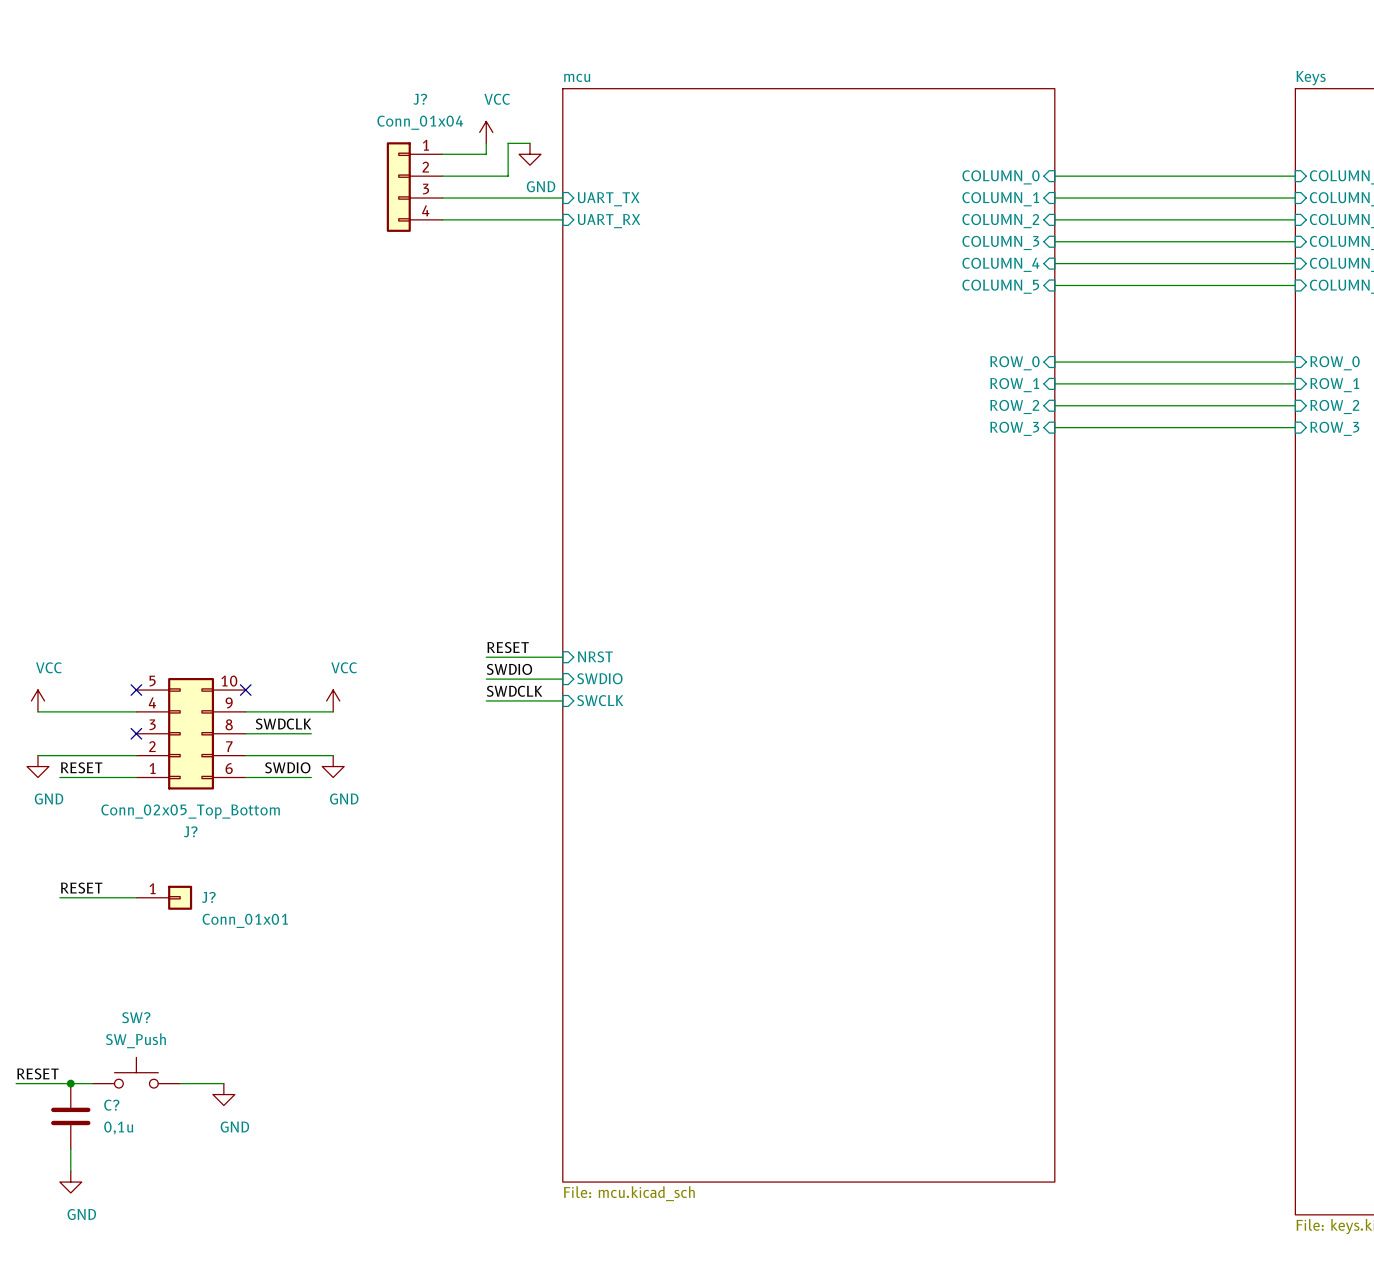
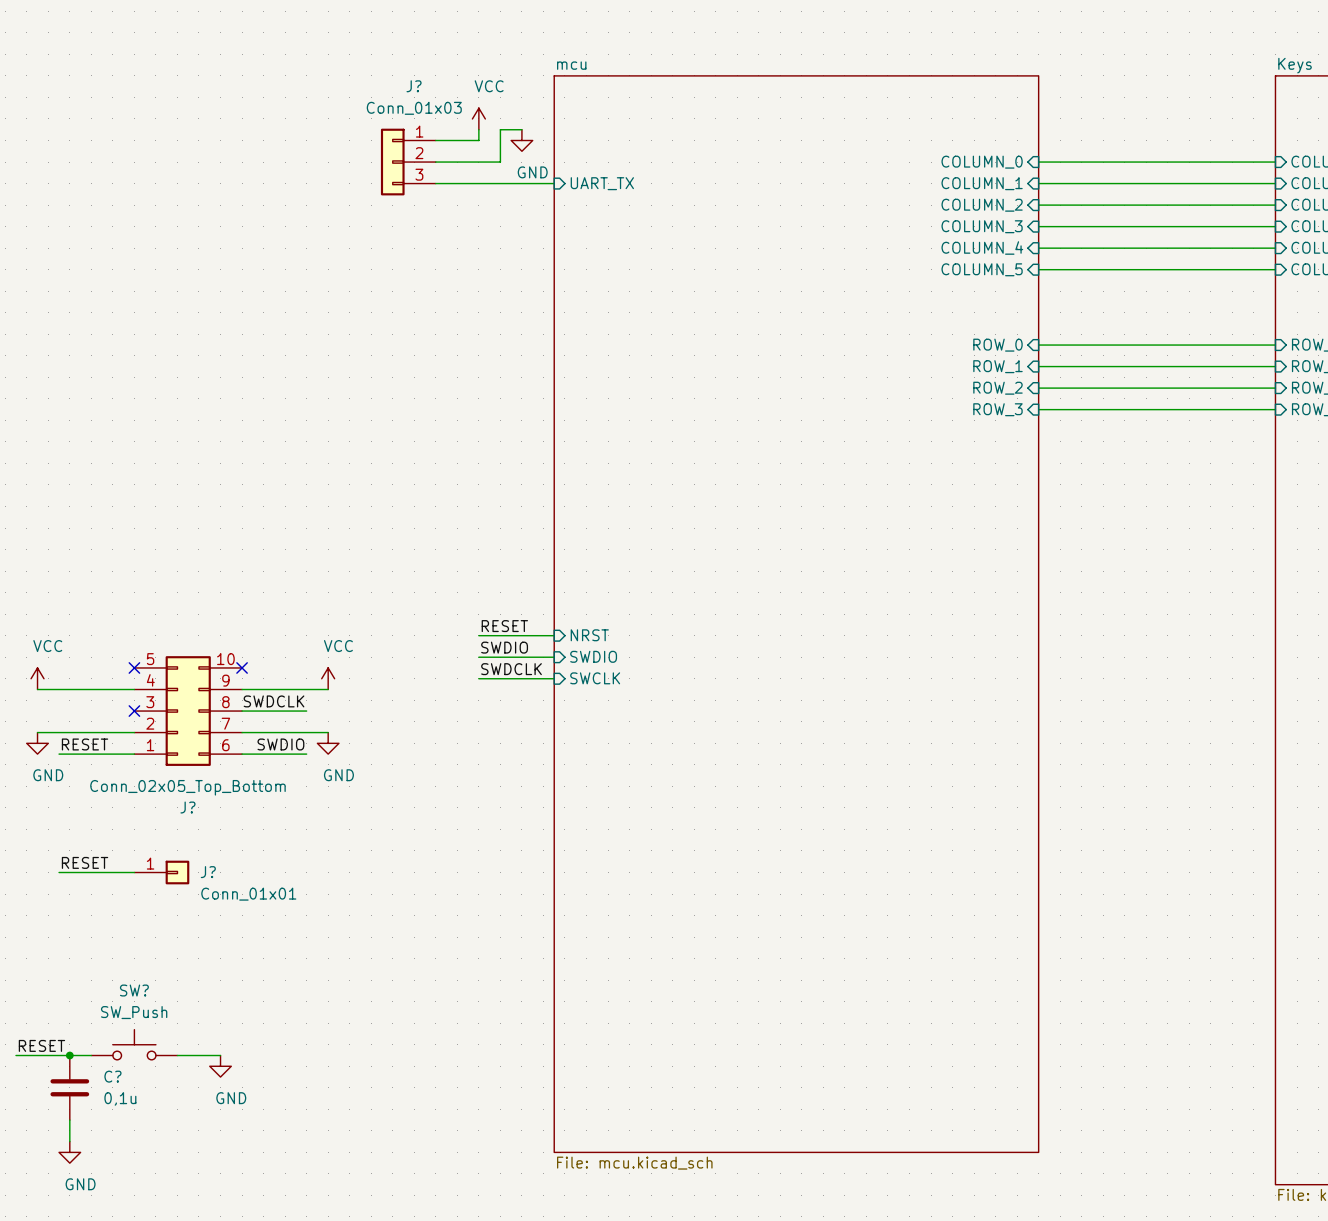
J?: none -> Conn_01x03 (408, 162)
J?: Conn_01x04 (414, 187) -> none
wire: (442, 219) (562, 219) -> none
sheet pin: UART_RX (609, 221) -> none

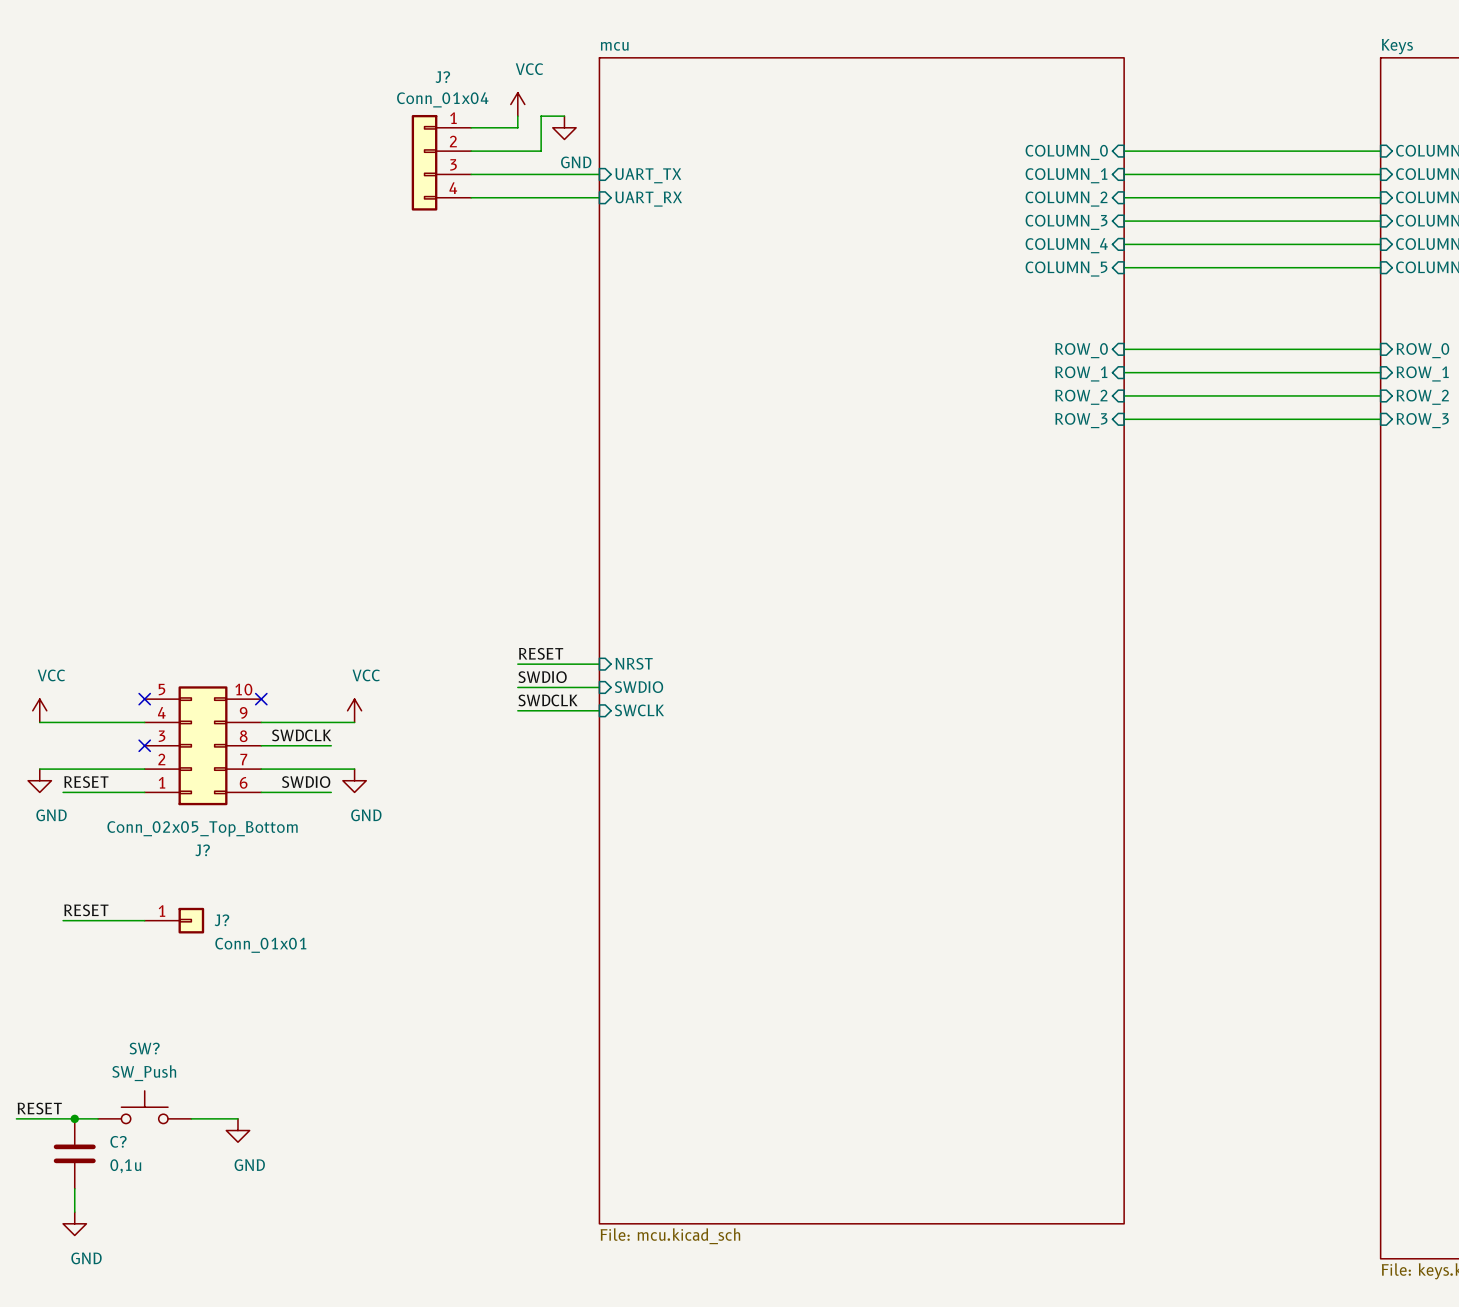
J?: Conn_01x03 (408, 162) -> none
J?: none -> Conn_01x04 (441, 162)
wire: none -> (471, 197) (599, 197)
sheet pin: none -> UART_RX (648, 199)

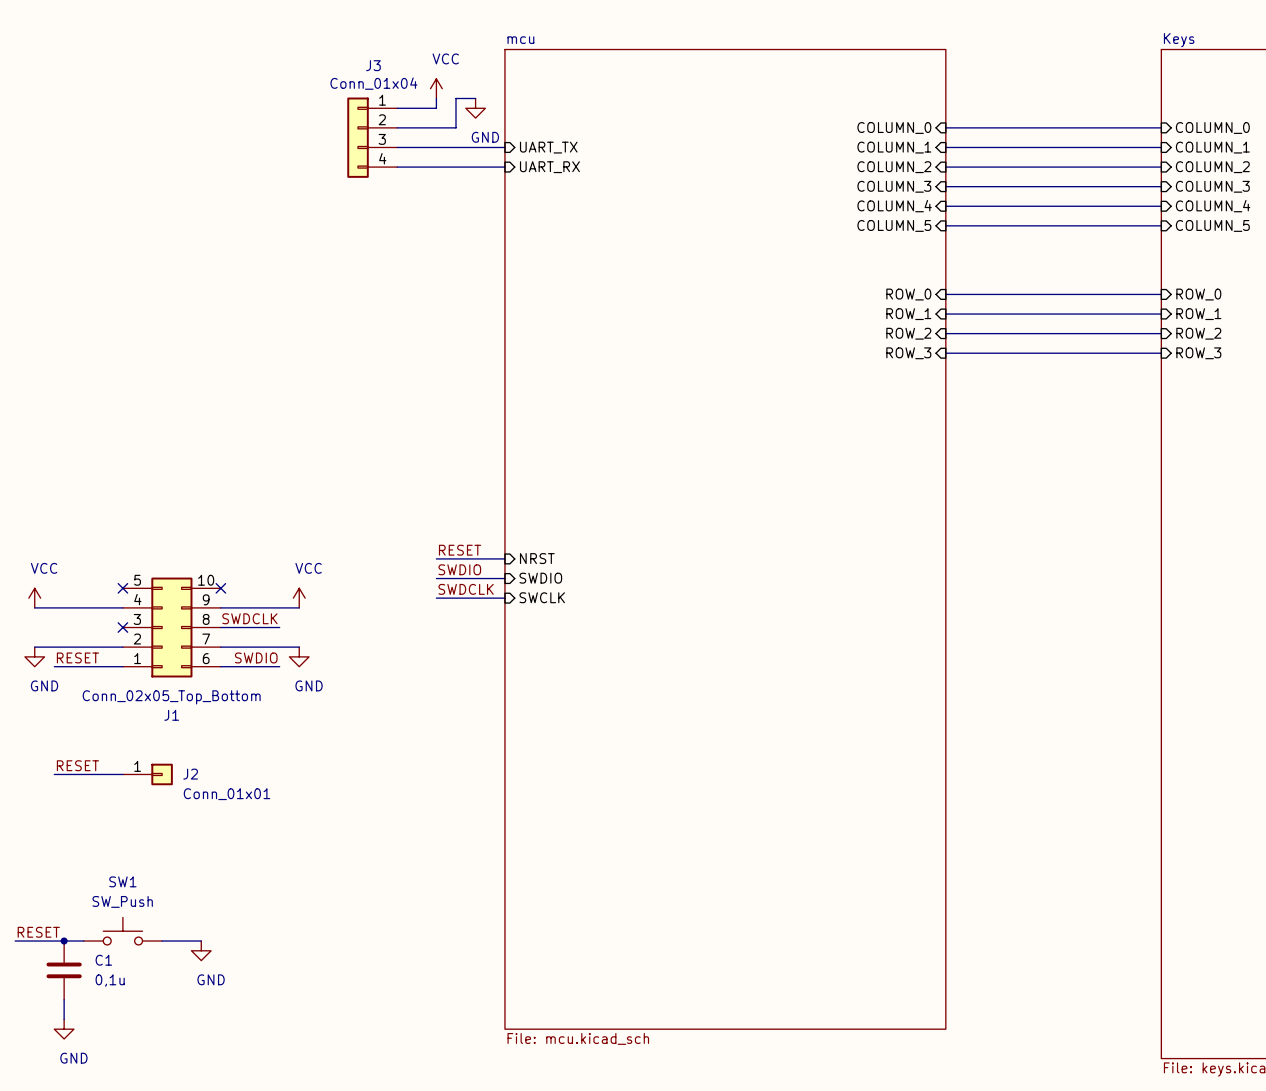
J? name: J? (442, 77) -> J3 (373, 65)
J? name: J? (202, 850) -> J1 (171, 715)
J? name: J? (221, 920) -> J2 (190, 774)
SW? name: SW? (144, 1048) -> SW1 (122, 881)
C? name: C? (118, 1141) -> C1 (103, 960)

